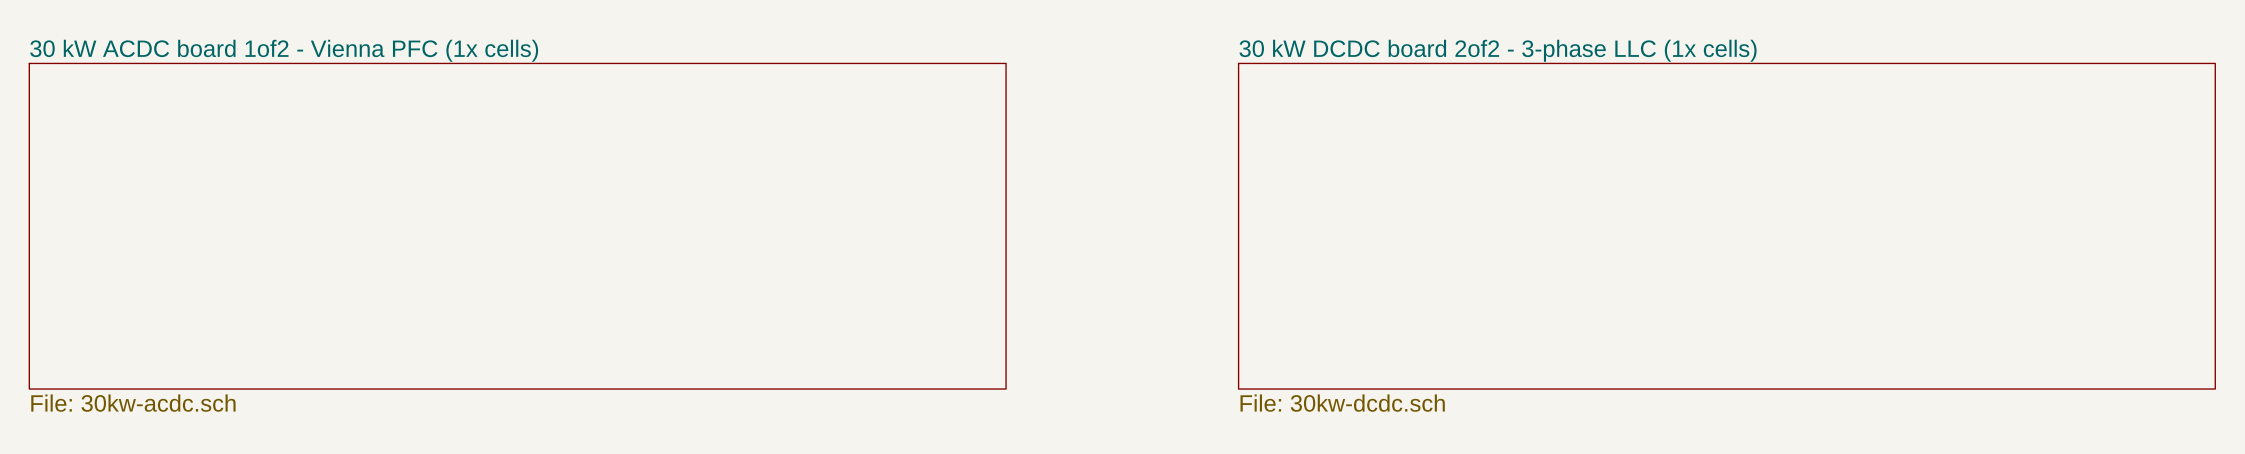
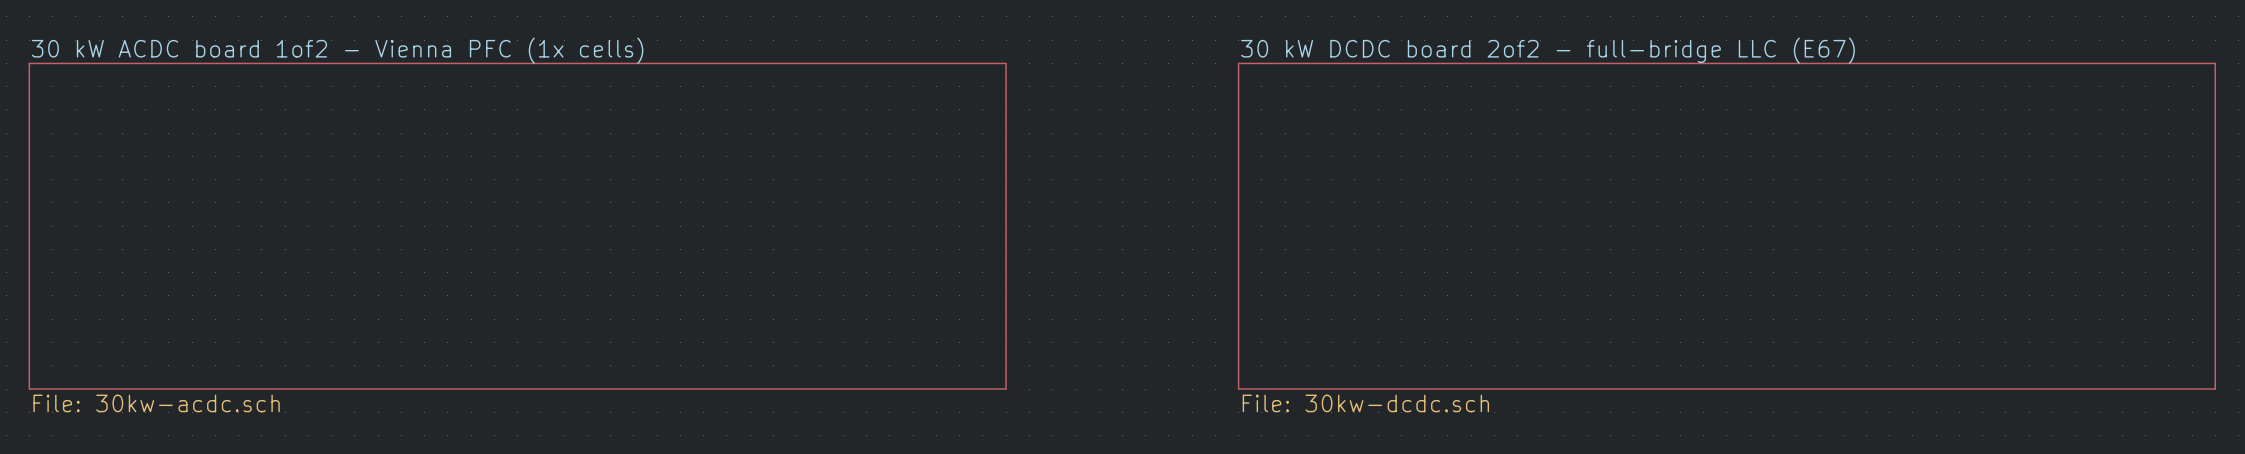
sheet 30 kW DCDC board 2of2 - 3-phase LLC (1x cells) name: 30 kW DCDC board 2of2 - 3-phase LLC (1x cells) (1498, 50) -> 30 kW DCDC board 2of2 - full-bridge LLC (E67) (1548, 50)

